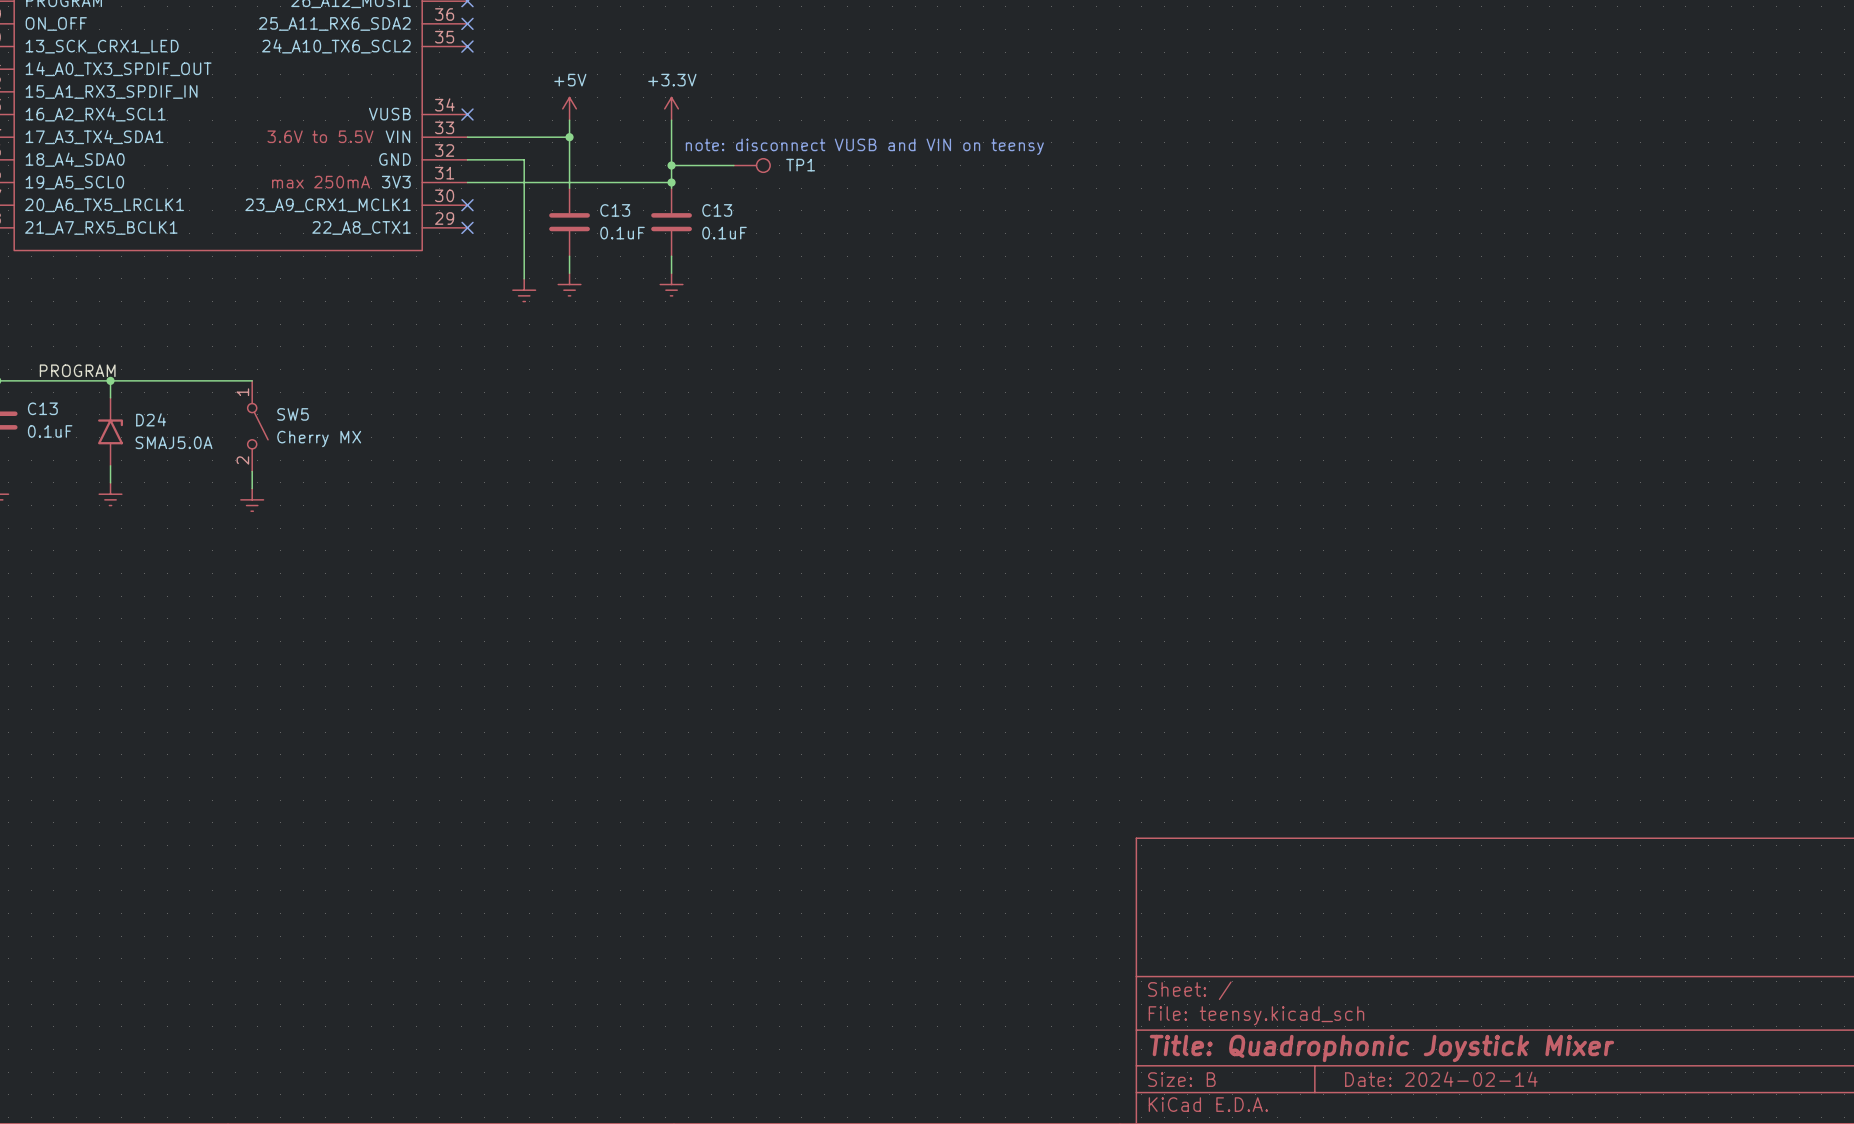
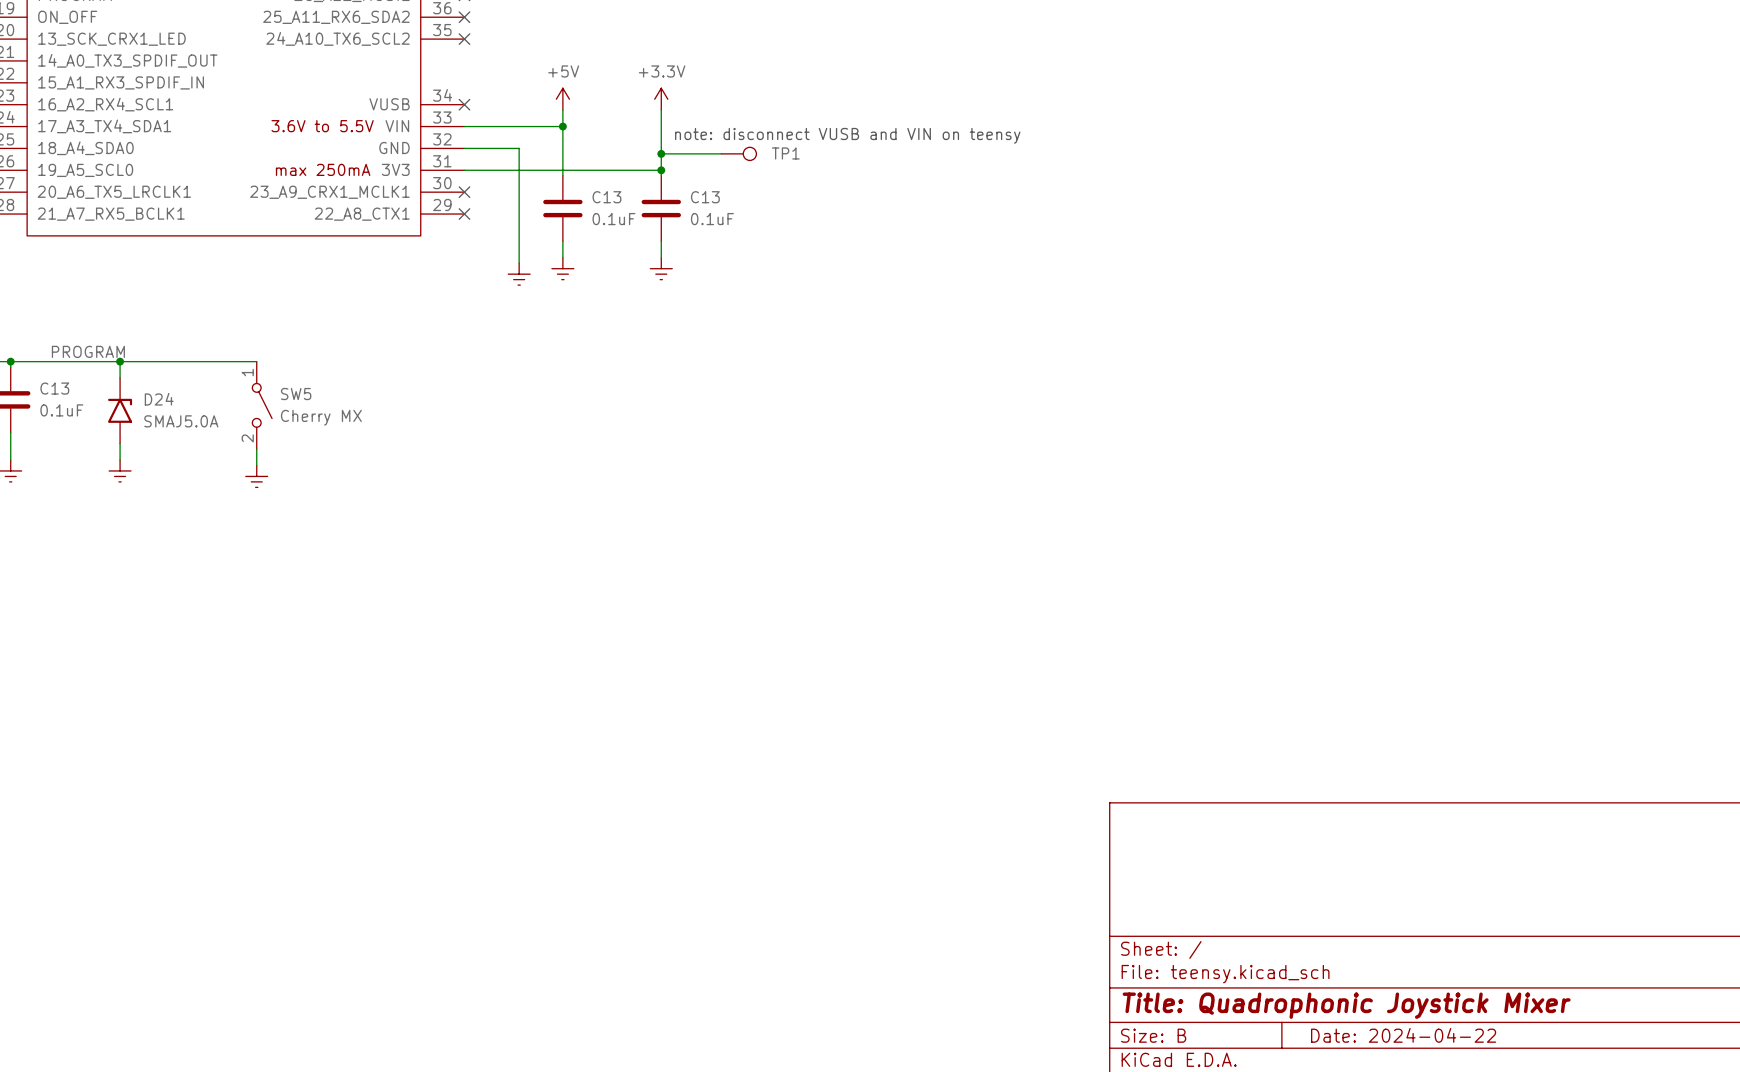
title block: Date: 2024-02-14 (1441, 1079) -> Date: 2024-04-22 (1403, 1035)

